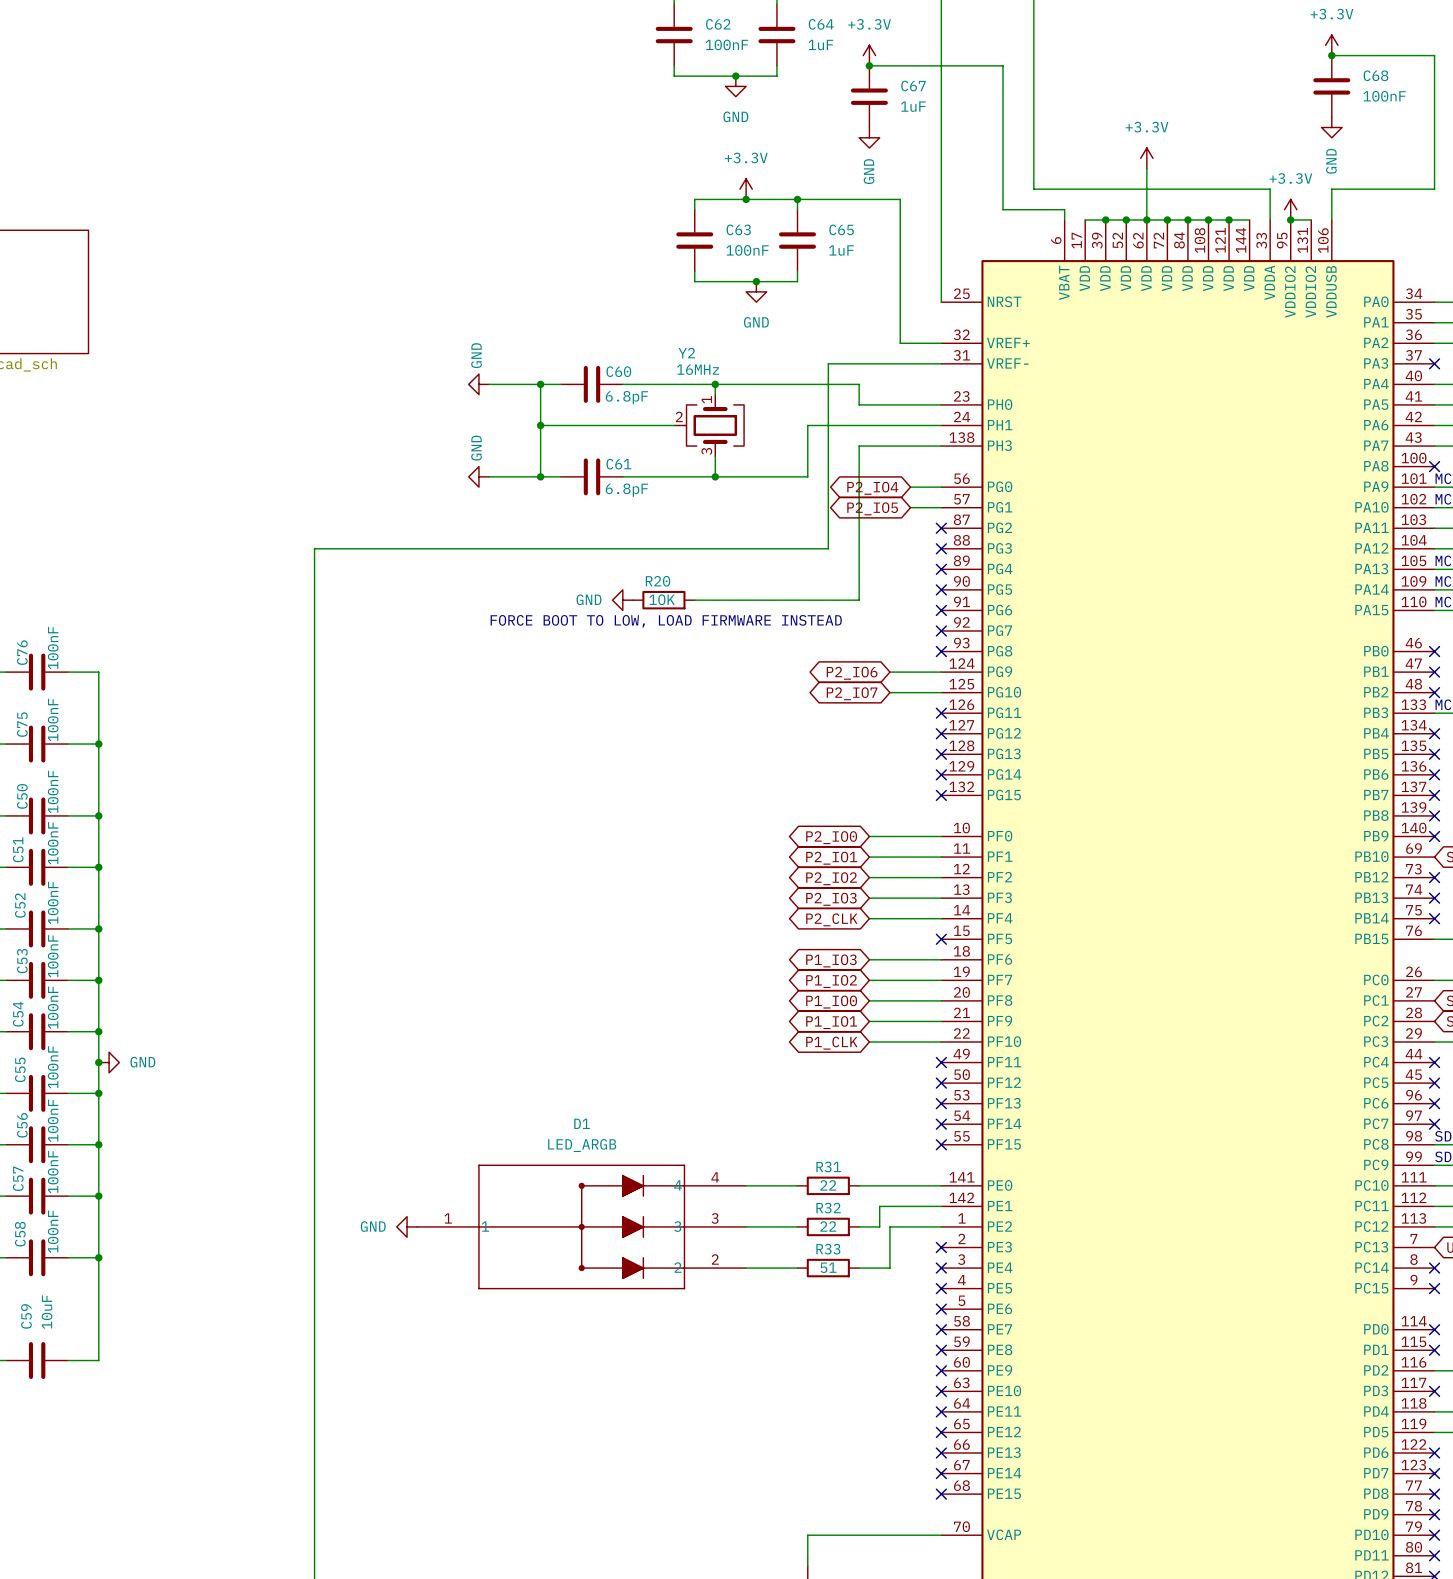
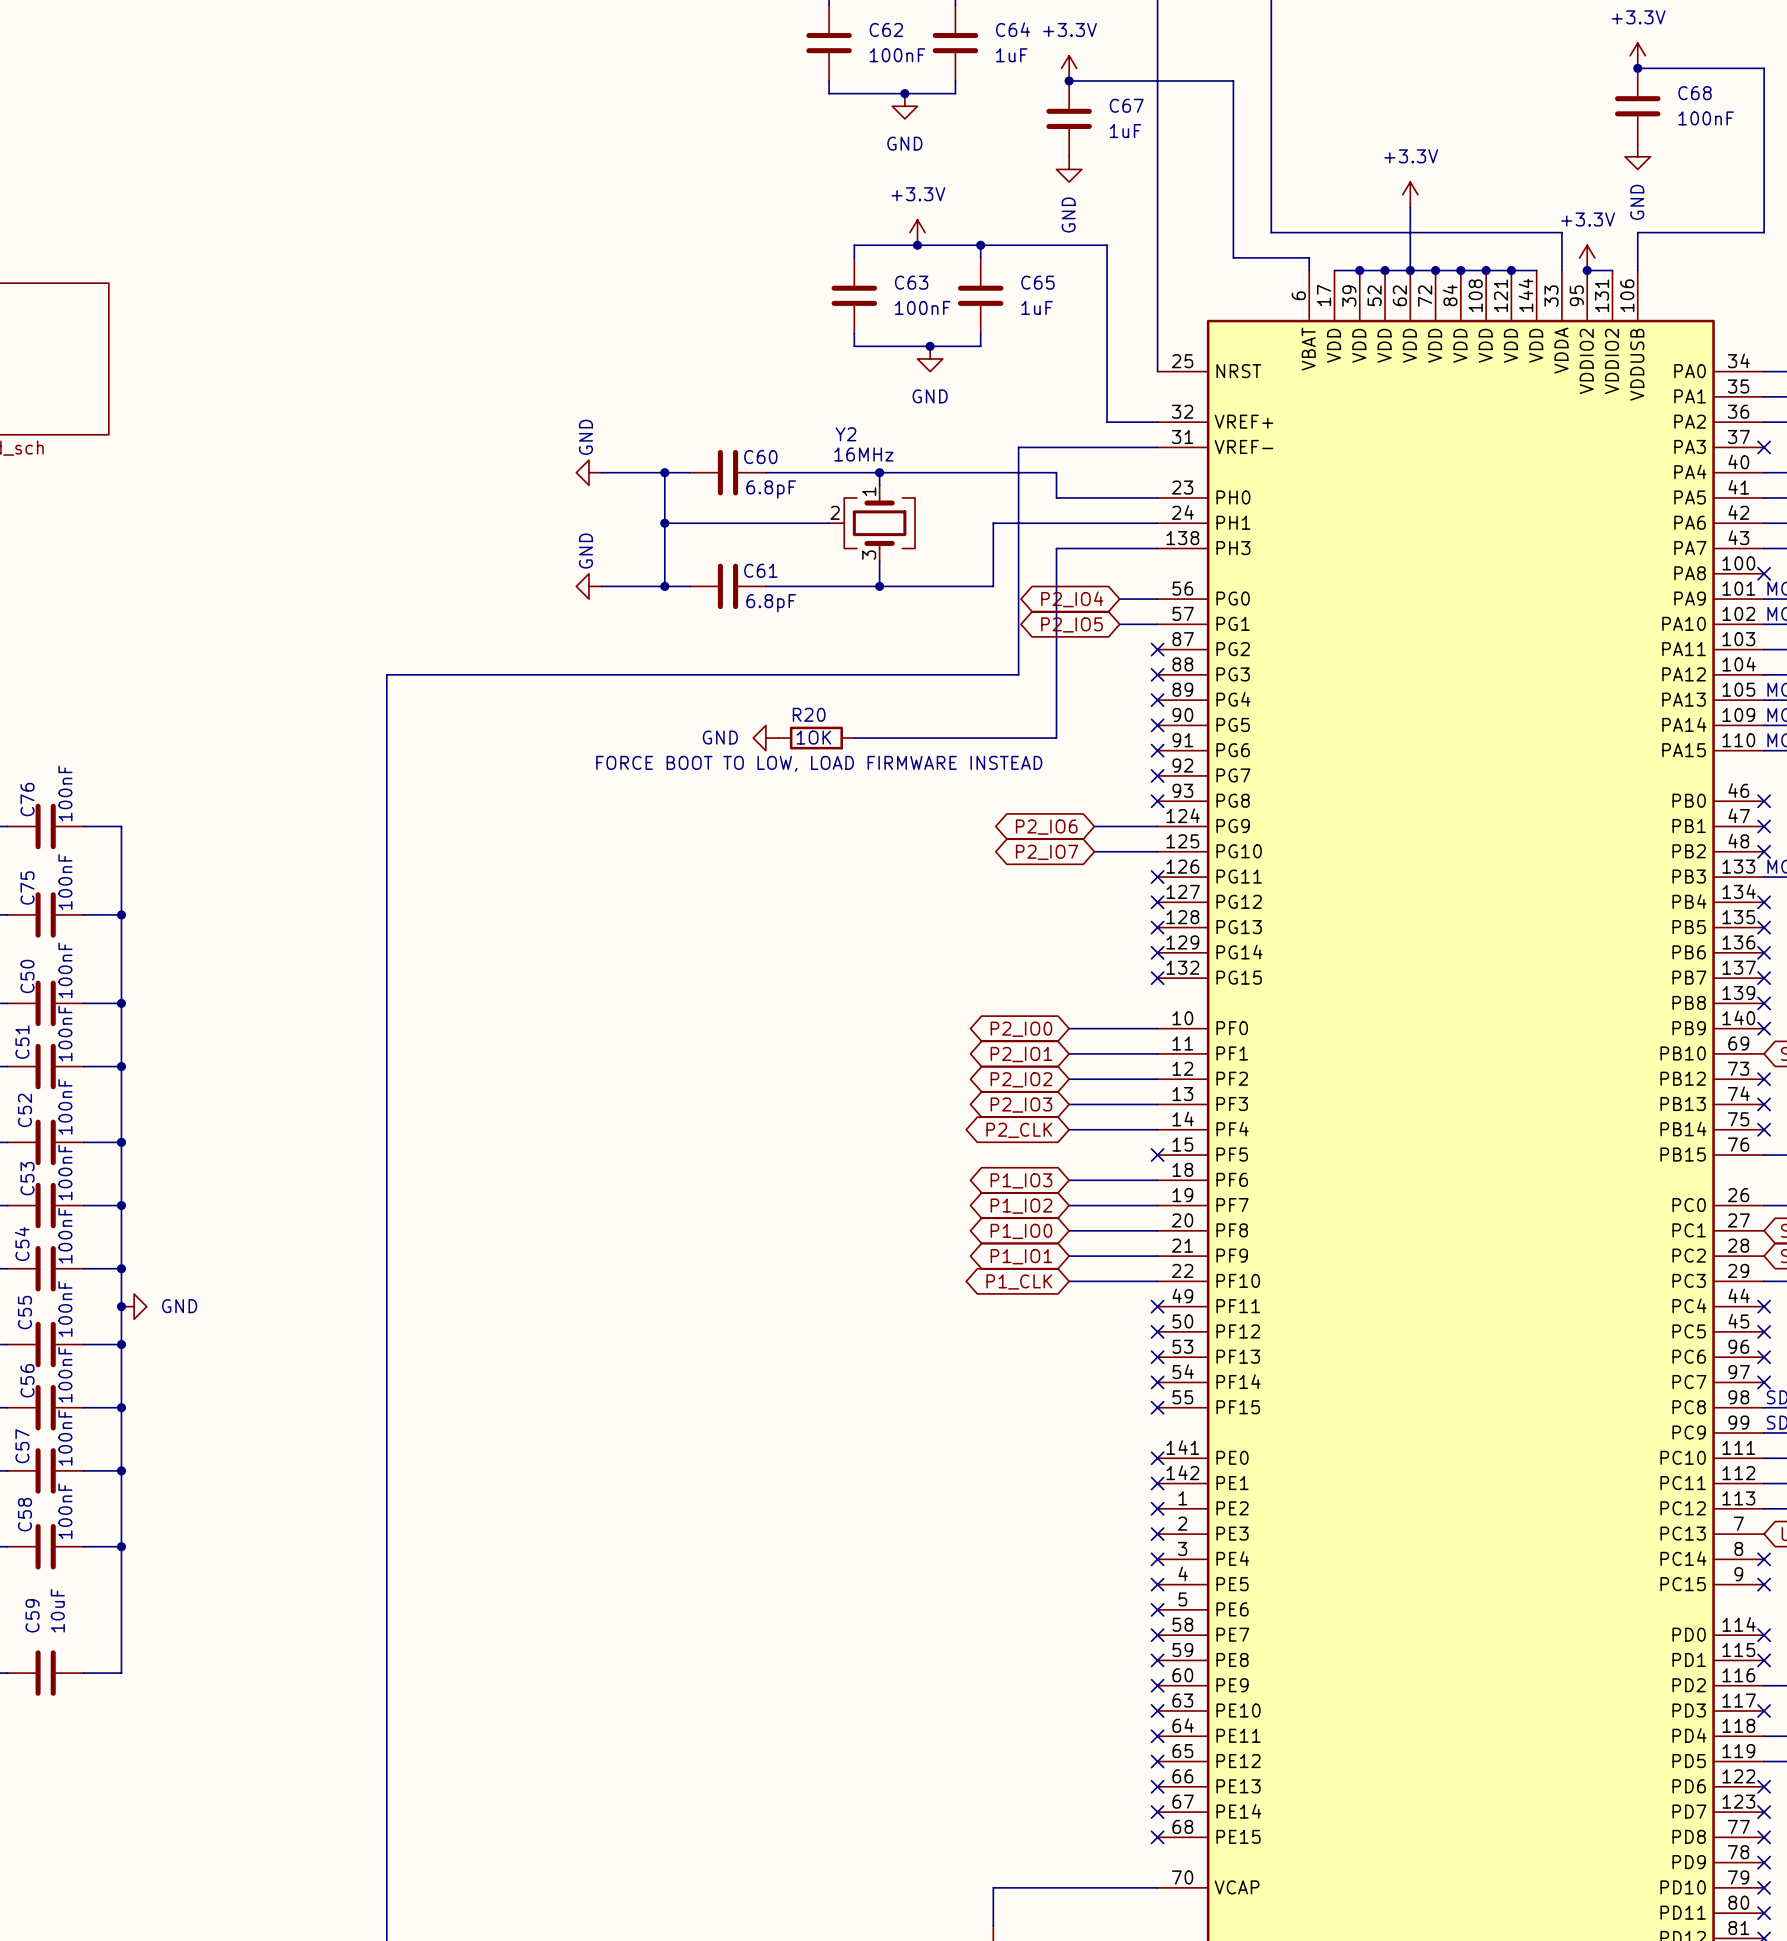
wire: (746, 1185) (797, 1185) -> none
R31: 22 (828, 1185) -> none
wire: (859, 1185) (941, 1185) -> none
no-connect mark: none -> (1157, 1458)
wire: (941, 1206) (879, 1206) (879, 1226) (859, 1226) -> none
no-connect mark: none -> (1157, 1483)
power symbol: GND (407, 1226) -> none
D1: LED_ARGB (581, 1226) -> none
wire: (746, 1226) (797, 1226) -> none
R32: 22 (828, 1226) -> none
wire: (941, 1226) (889, 1226) (889, 1268) (859, 1268) -> none
no-connect mark: none -> (1157, 1508)
wire: (746, 1268) (797, 1268) -> none
R33: 51 (828, 1268) -> none

